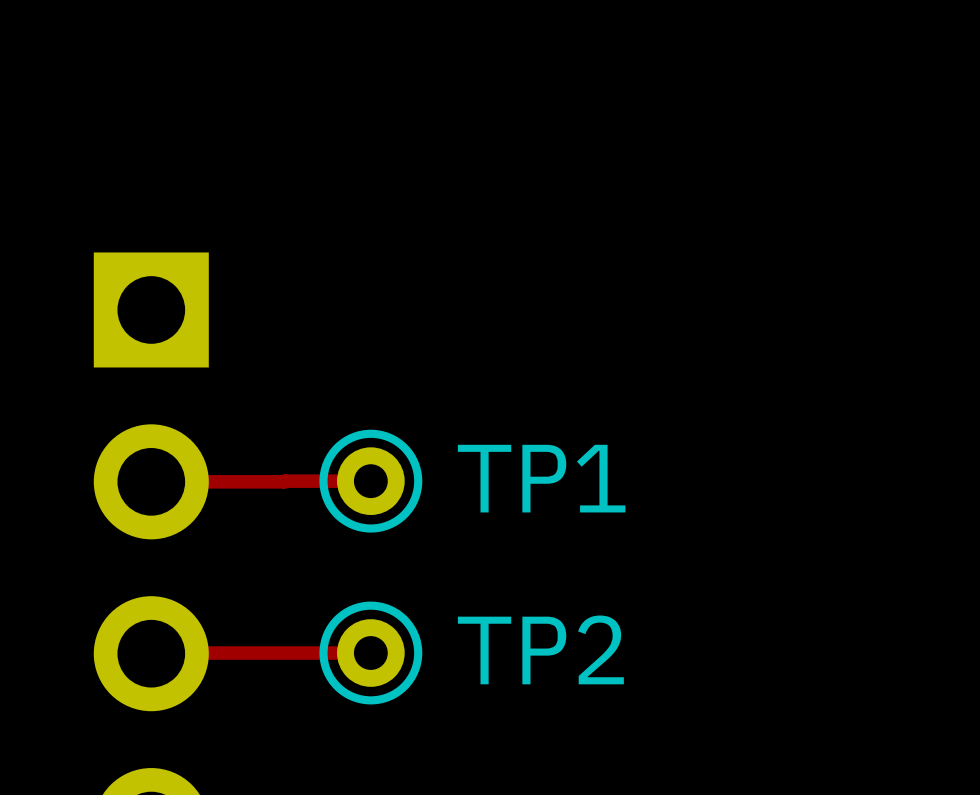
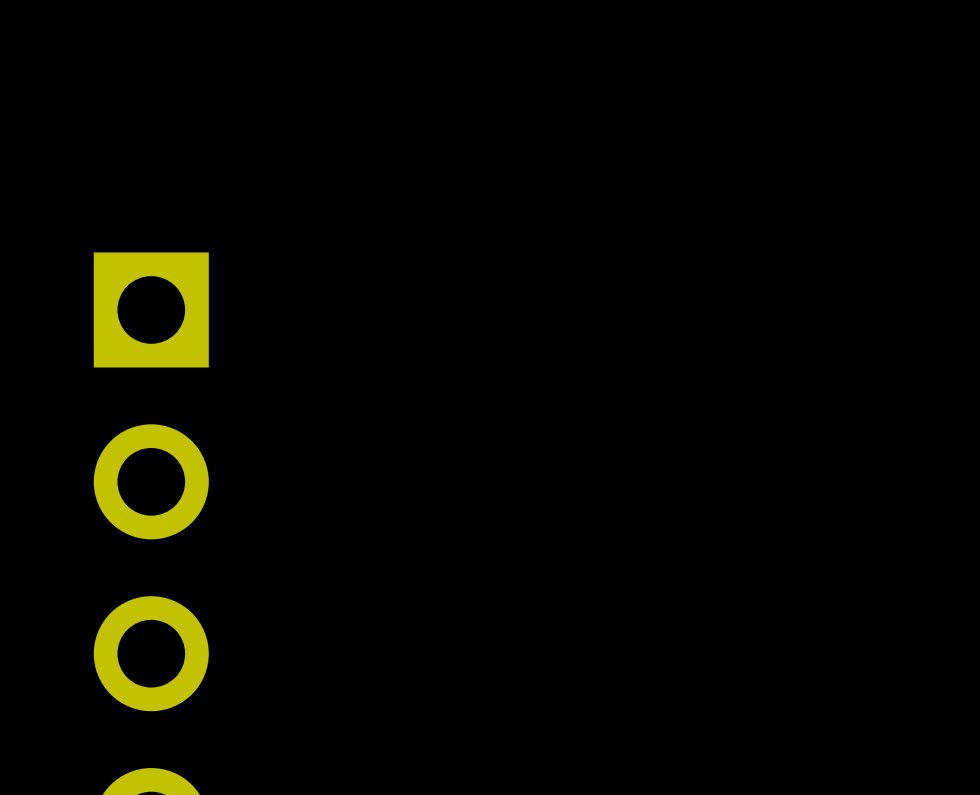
track: (151, 481) (284, 481) -> none
track: (284, 481) (370, 481) -> none
TP1: (370, 481) -> none
track: (151, 653) (370, 653) -> none
TP2: (370, 653) -> none

